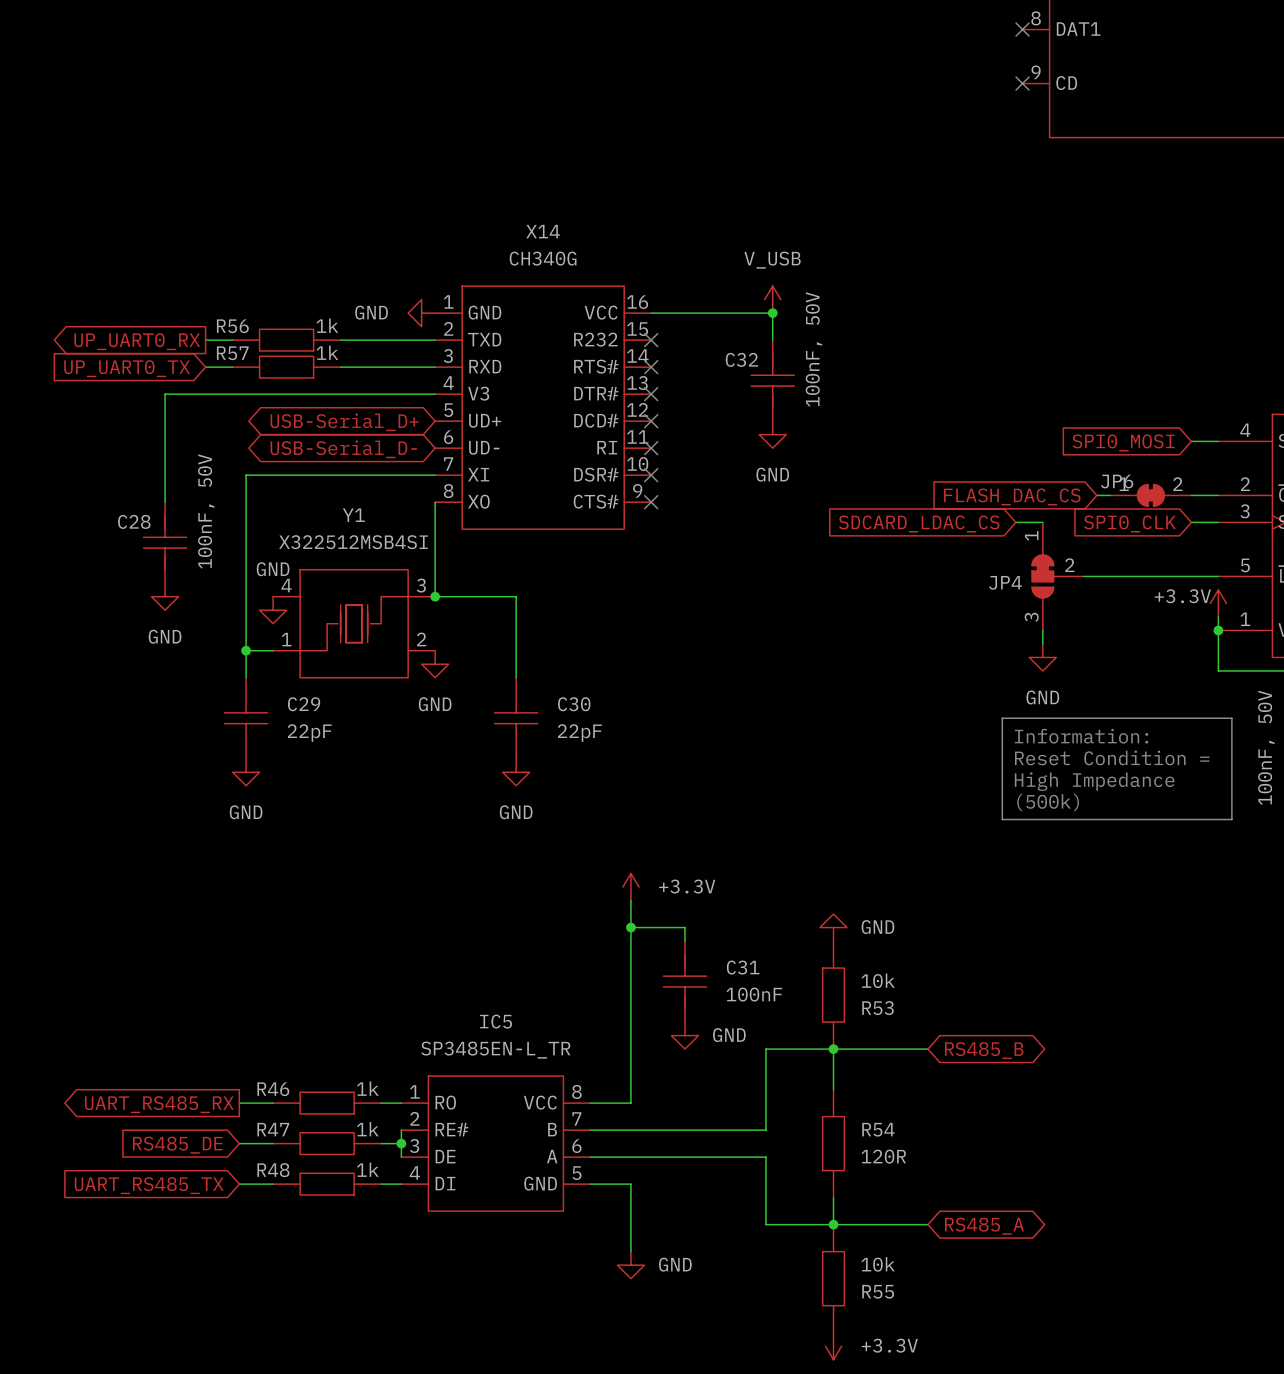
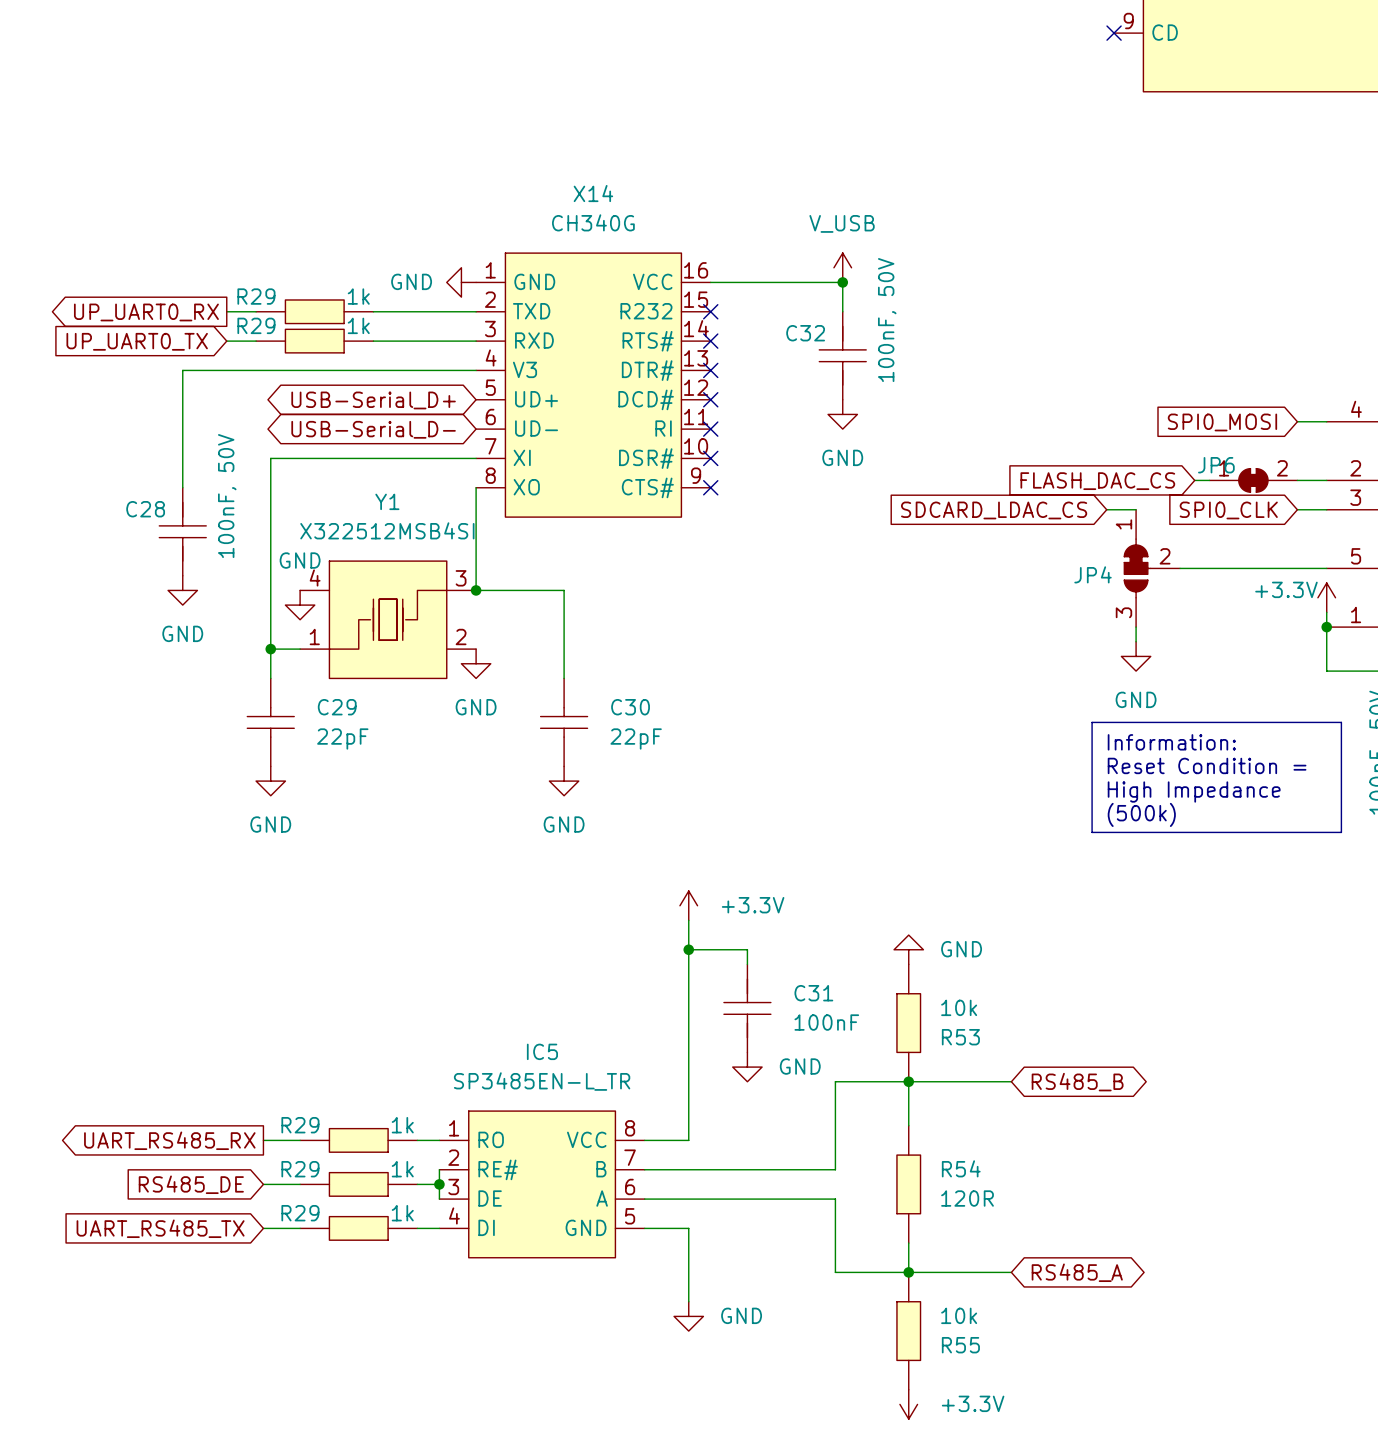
R56 name: R56 (232, 326) -> R29 (256, 296)
R57 name: R57 (232, 353) -> R29 (256, 325)
R46 name: R46 (273, 1089) -> R29 (300, 1125)
R47 name: R47 (273, 1129) -> R29 (300, 1169)
R48 name: R48 (273, 1170) -> R29 (300, 1213)

